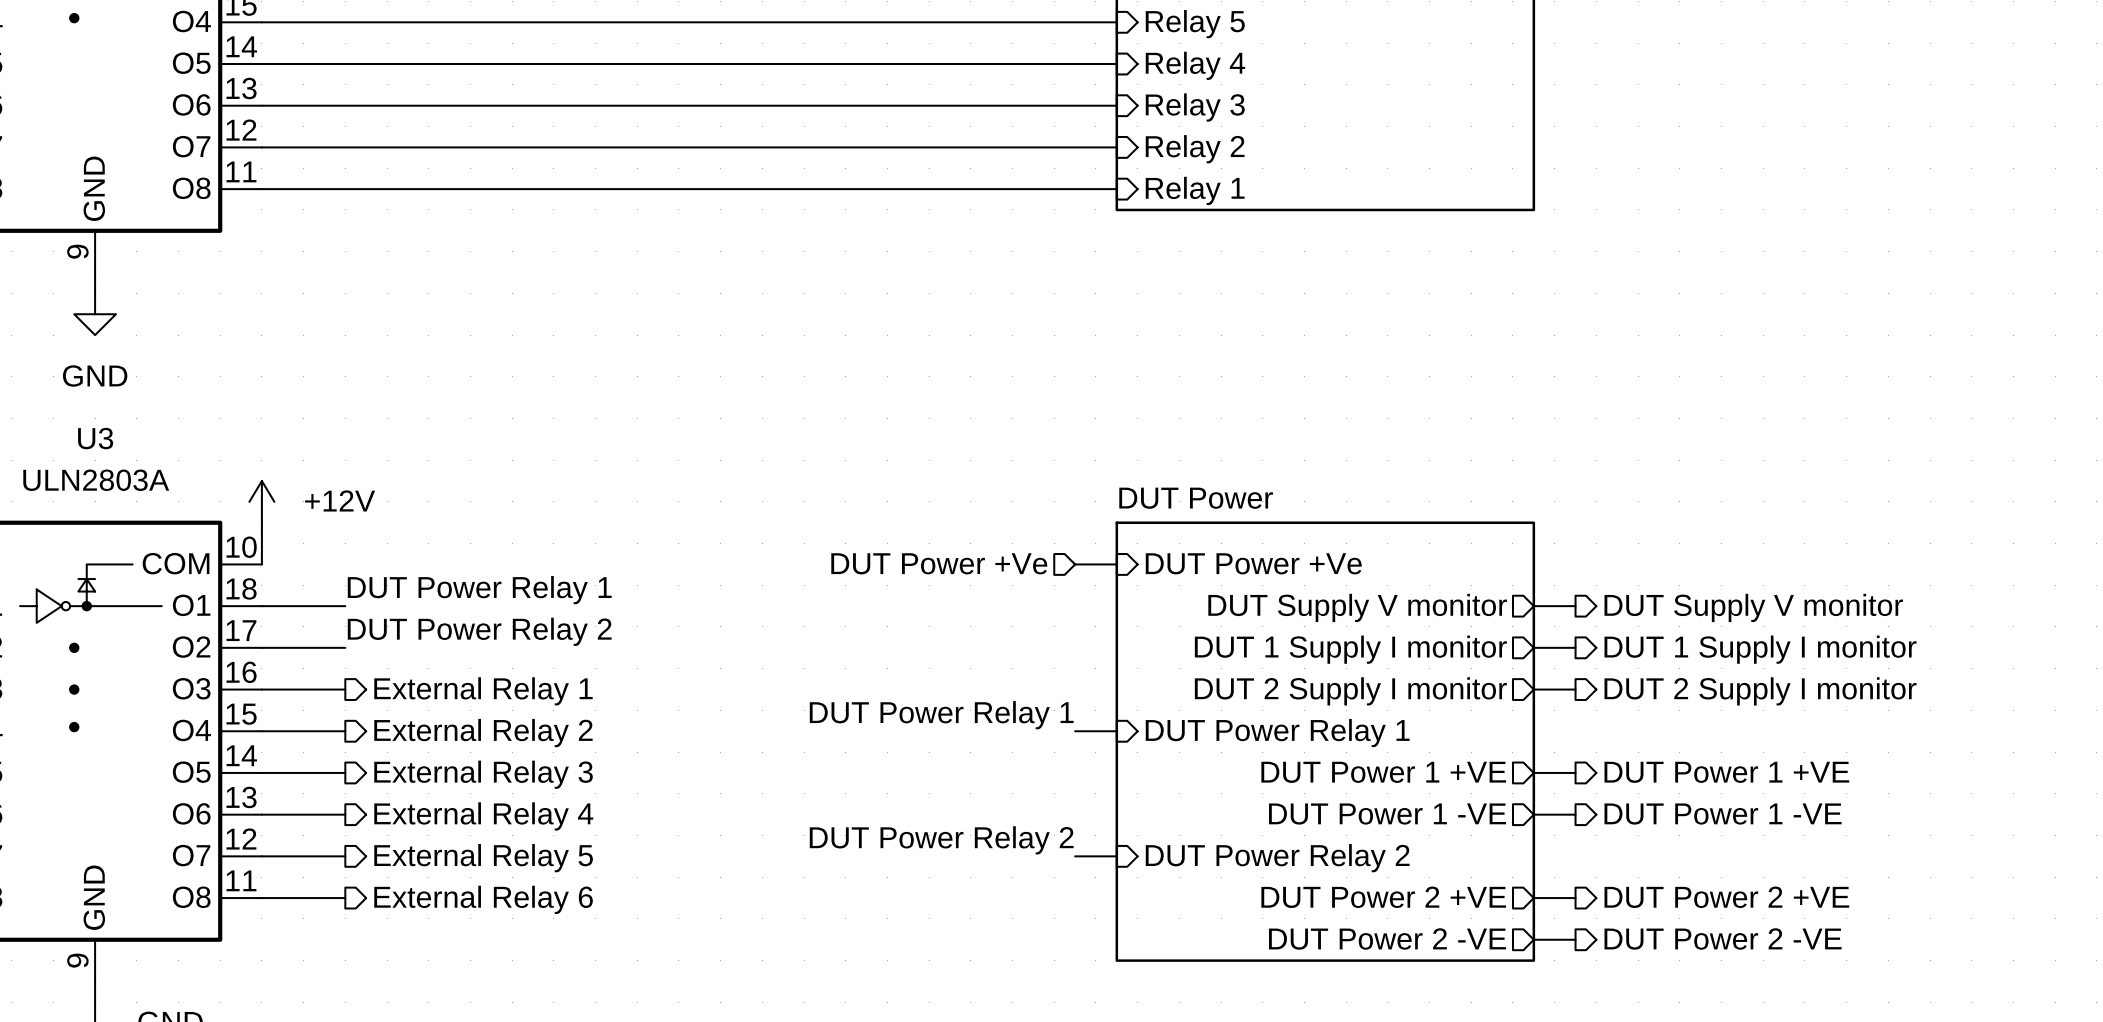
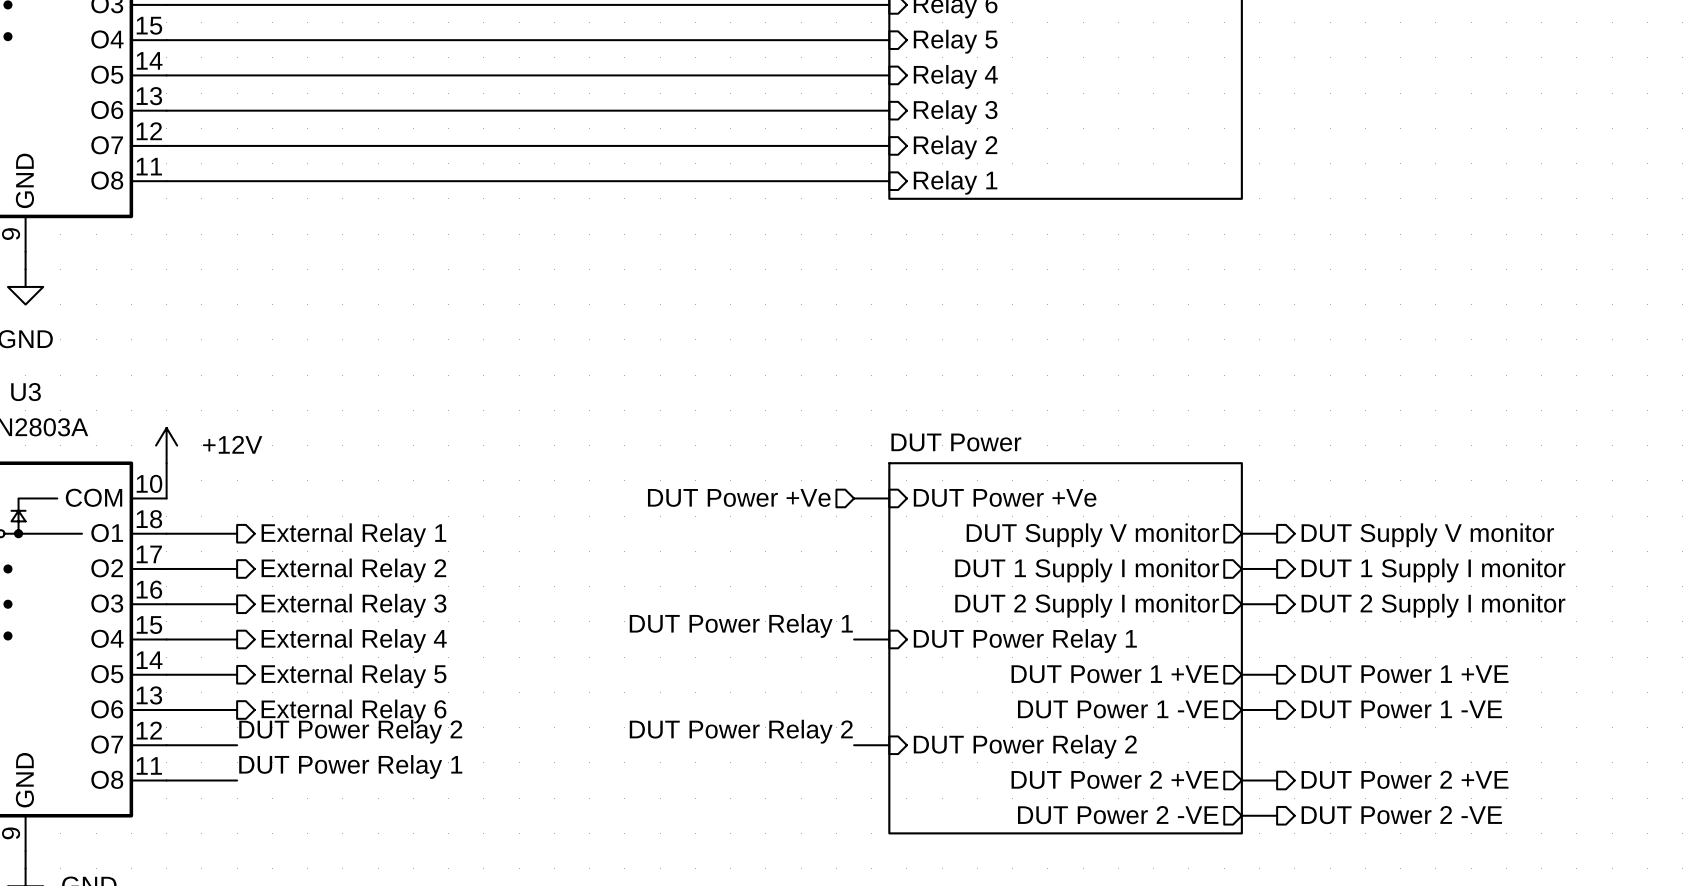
label position: DUT Power Relay 1 (479, 590) -> DUT Power Relay 1 (350, 766)
hierarchical label: none -> External Relay 1 (353, 535)
label position: DUT Power Relay 2 (479, 631) -> DUT Power Relay 2 (350, 731)
hierarchical label: none -> External Relay 2 (353, 570)
hierarchical label: External Relay 1 (483, 691) -> External Relay 3 (353, 605)
hierarchical label: External Relay 2 (483, 733) -> External Relay 4 (354, 641)
hierarchical label: External Relay 3 (483, 774) -> External Relay 5 (354, 676)
hierarchical label: External Relay 4 (483, 816) -> External Relay 6 (353, 711)
hierarchical label: External Relay 5 (483, 858) -> none
hierarchical label: External Relay 6 (483, 899) -> none

